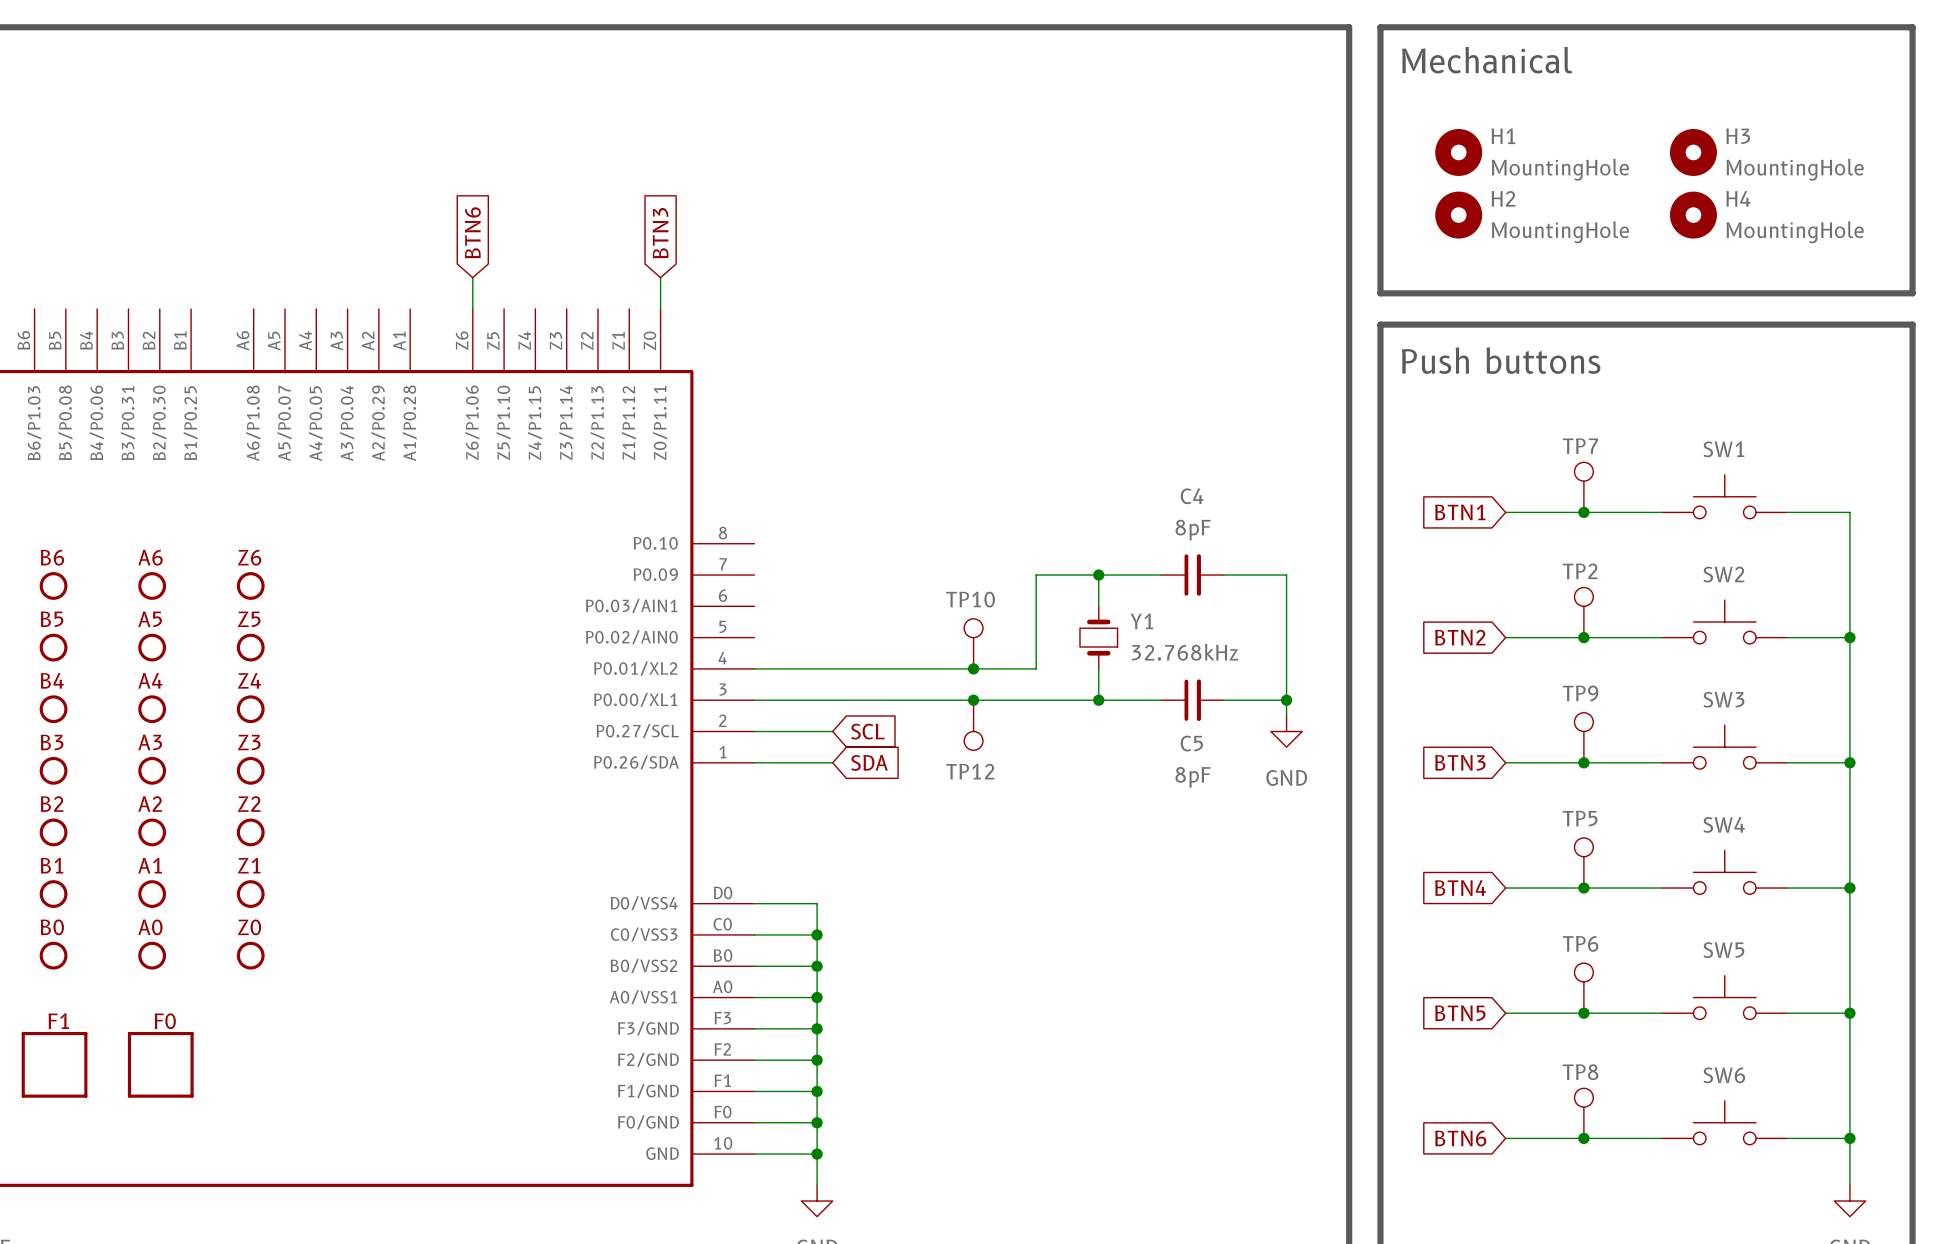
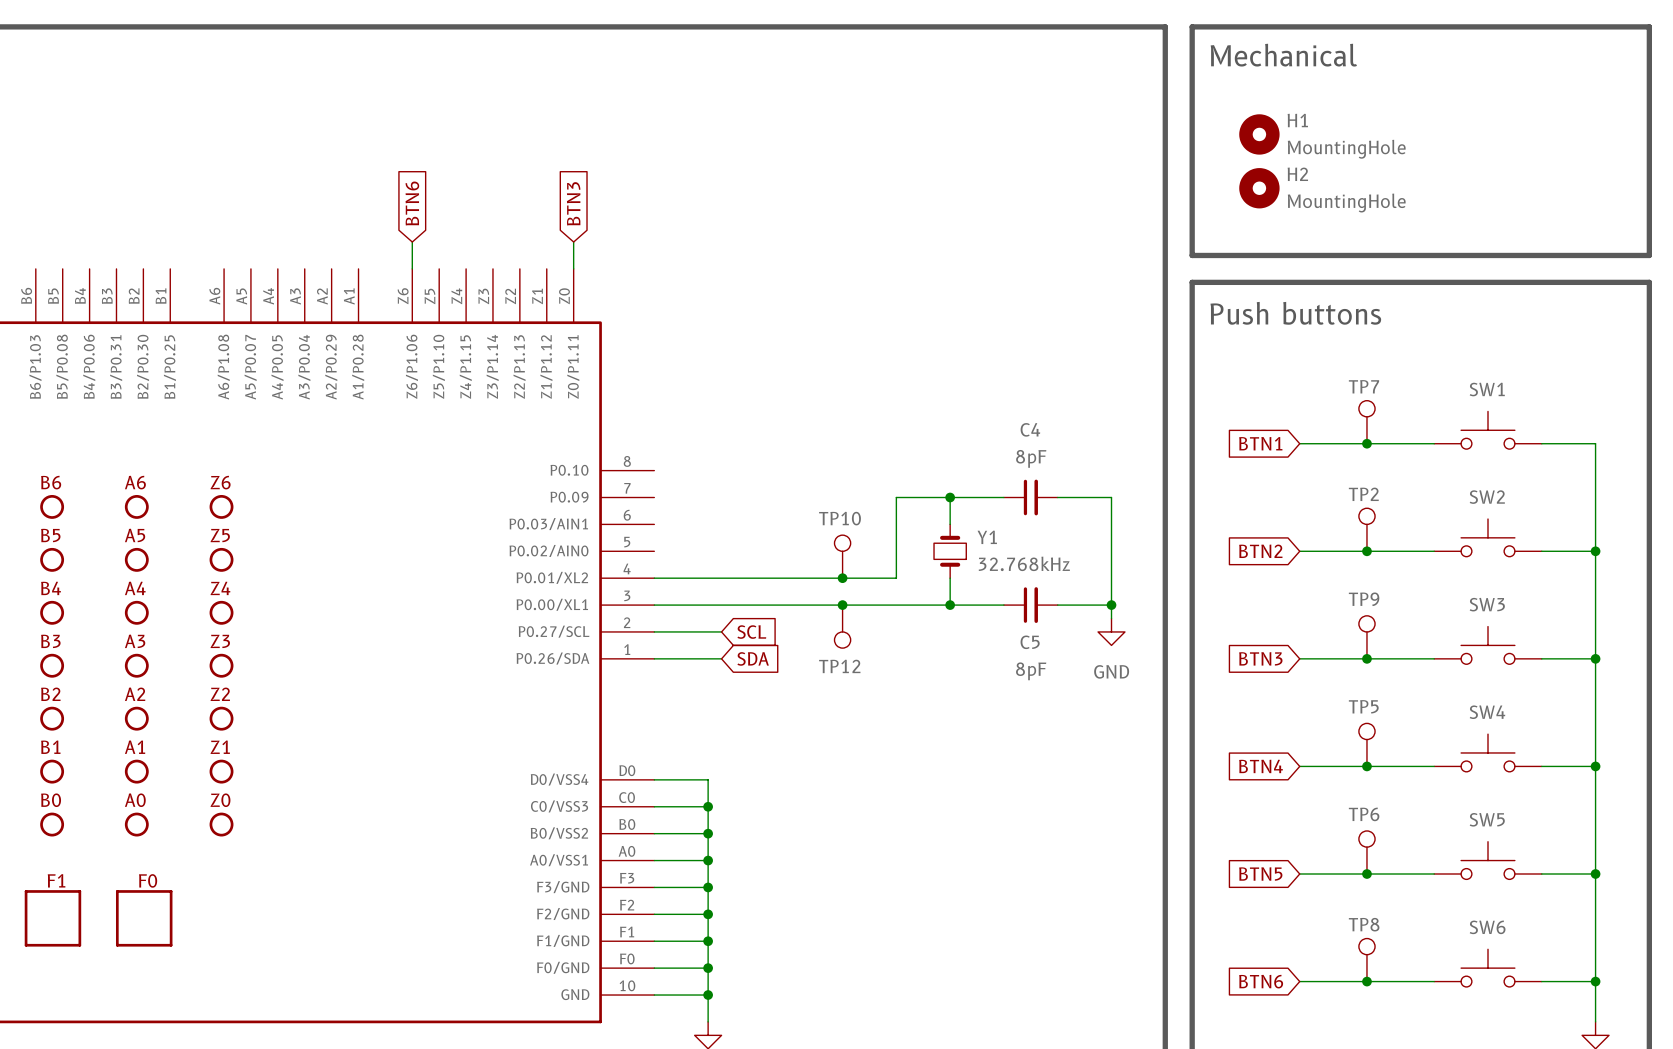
H3: MountingHole (1693, 152) -> none
H4: MountingHole (1693, 215) -> none

